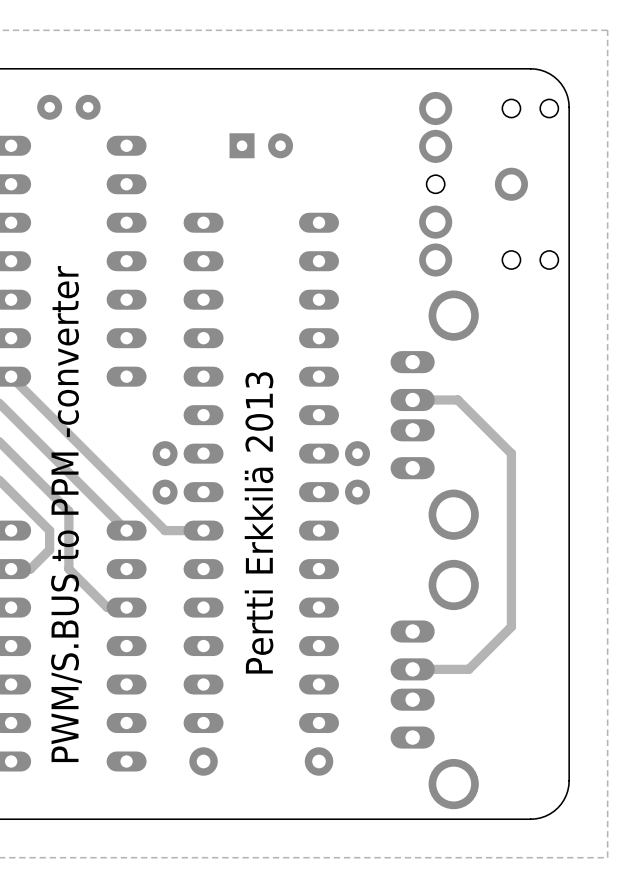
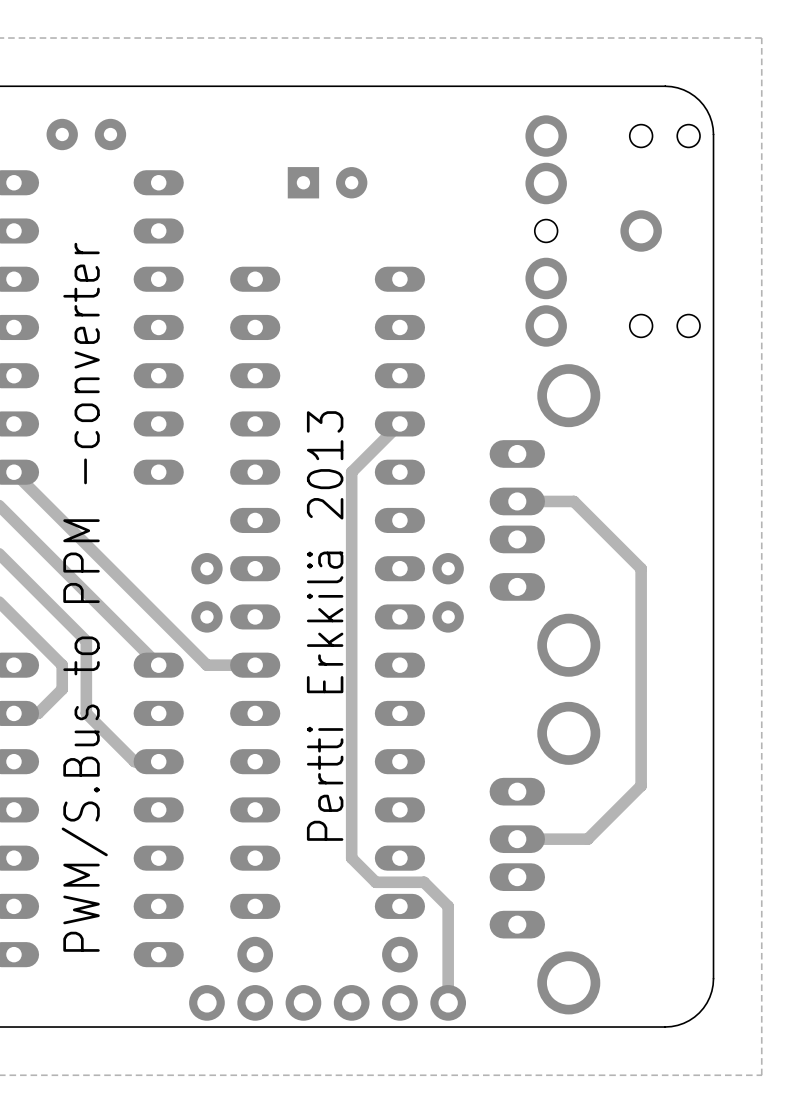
track: none -> (399, 423) (351, 472) (351, 858) (375, 882) (424, 882) (448, 906) (448, 1002)
text: PWM/S.BUS to PPM -converter (66, 514) -> PWM/S.Bus to PPM -converter (84, 597)
part: none -> (327, 1002)

